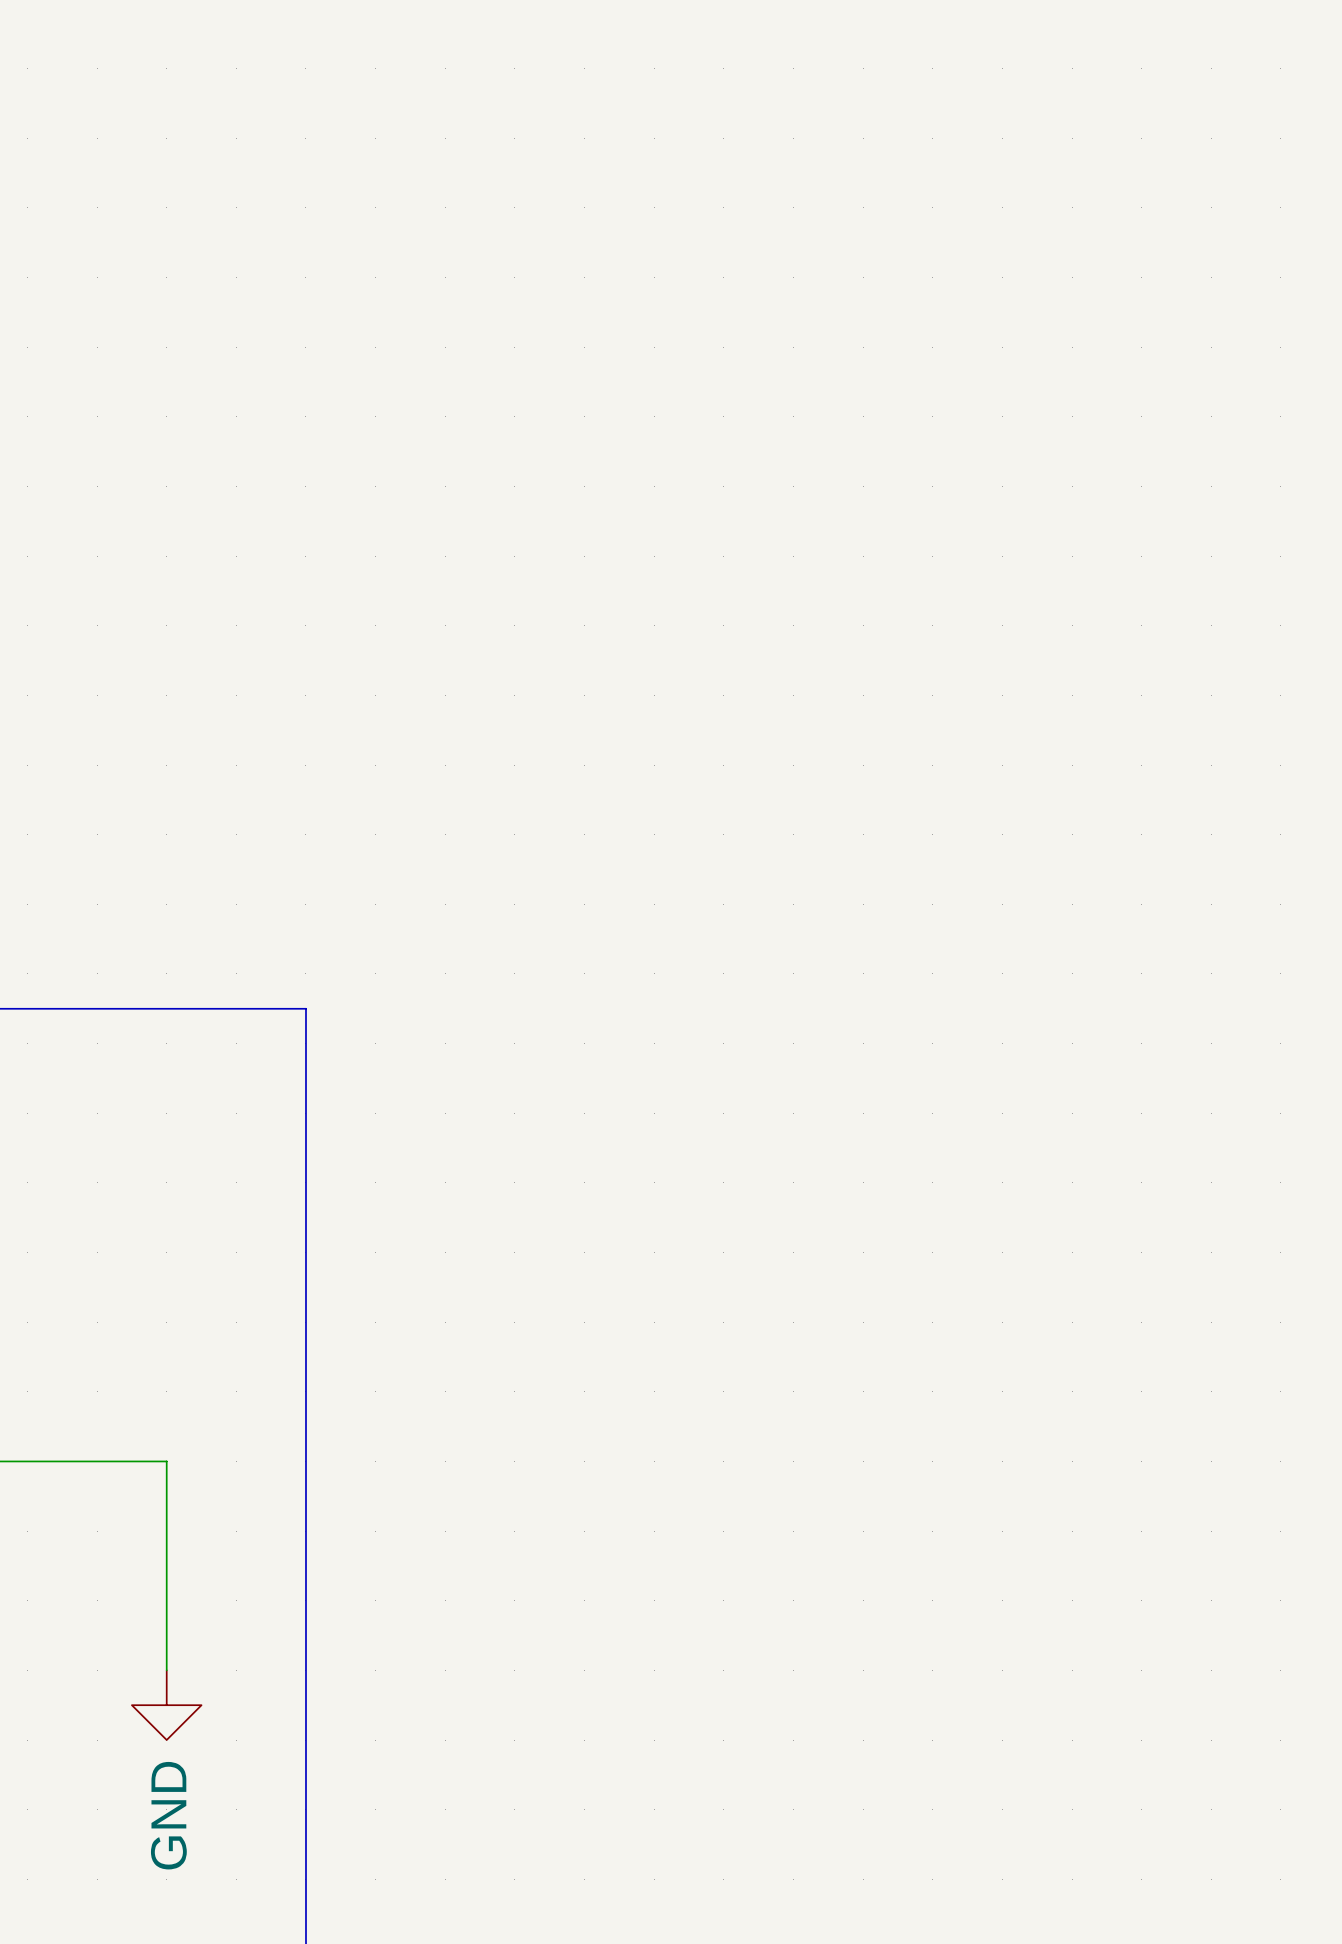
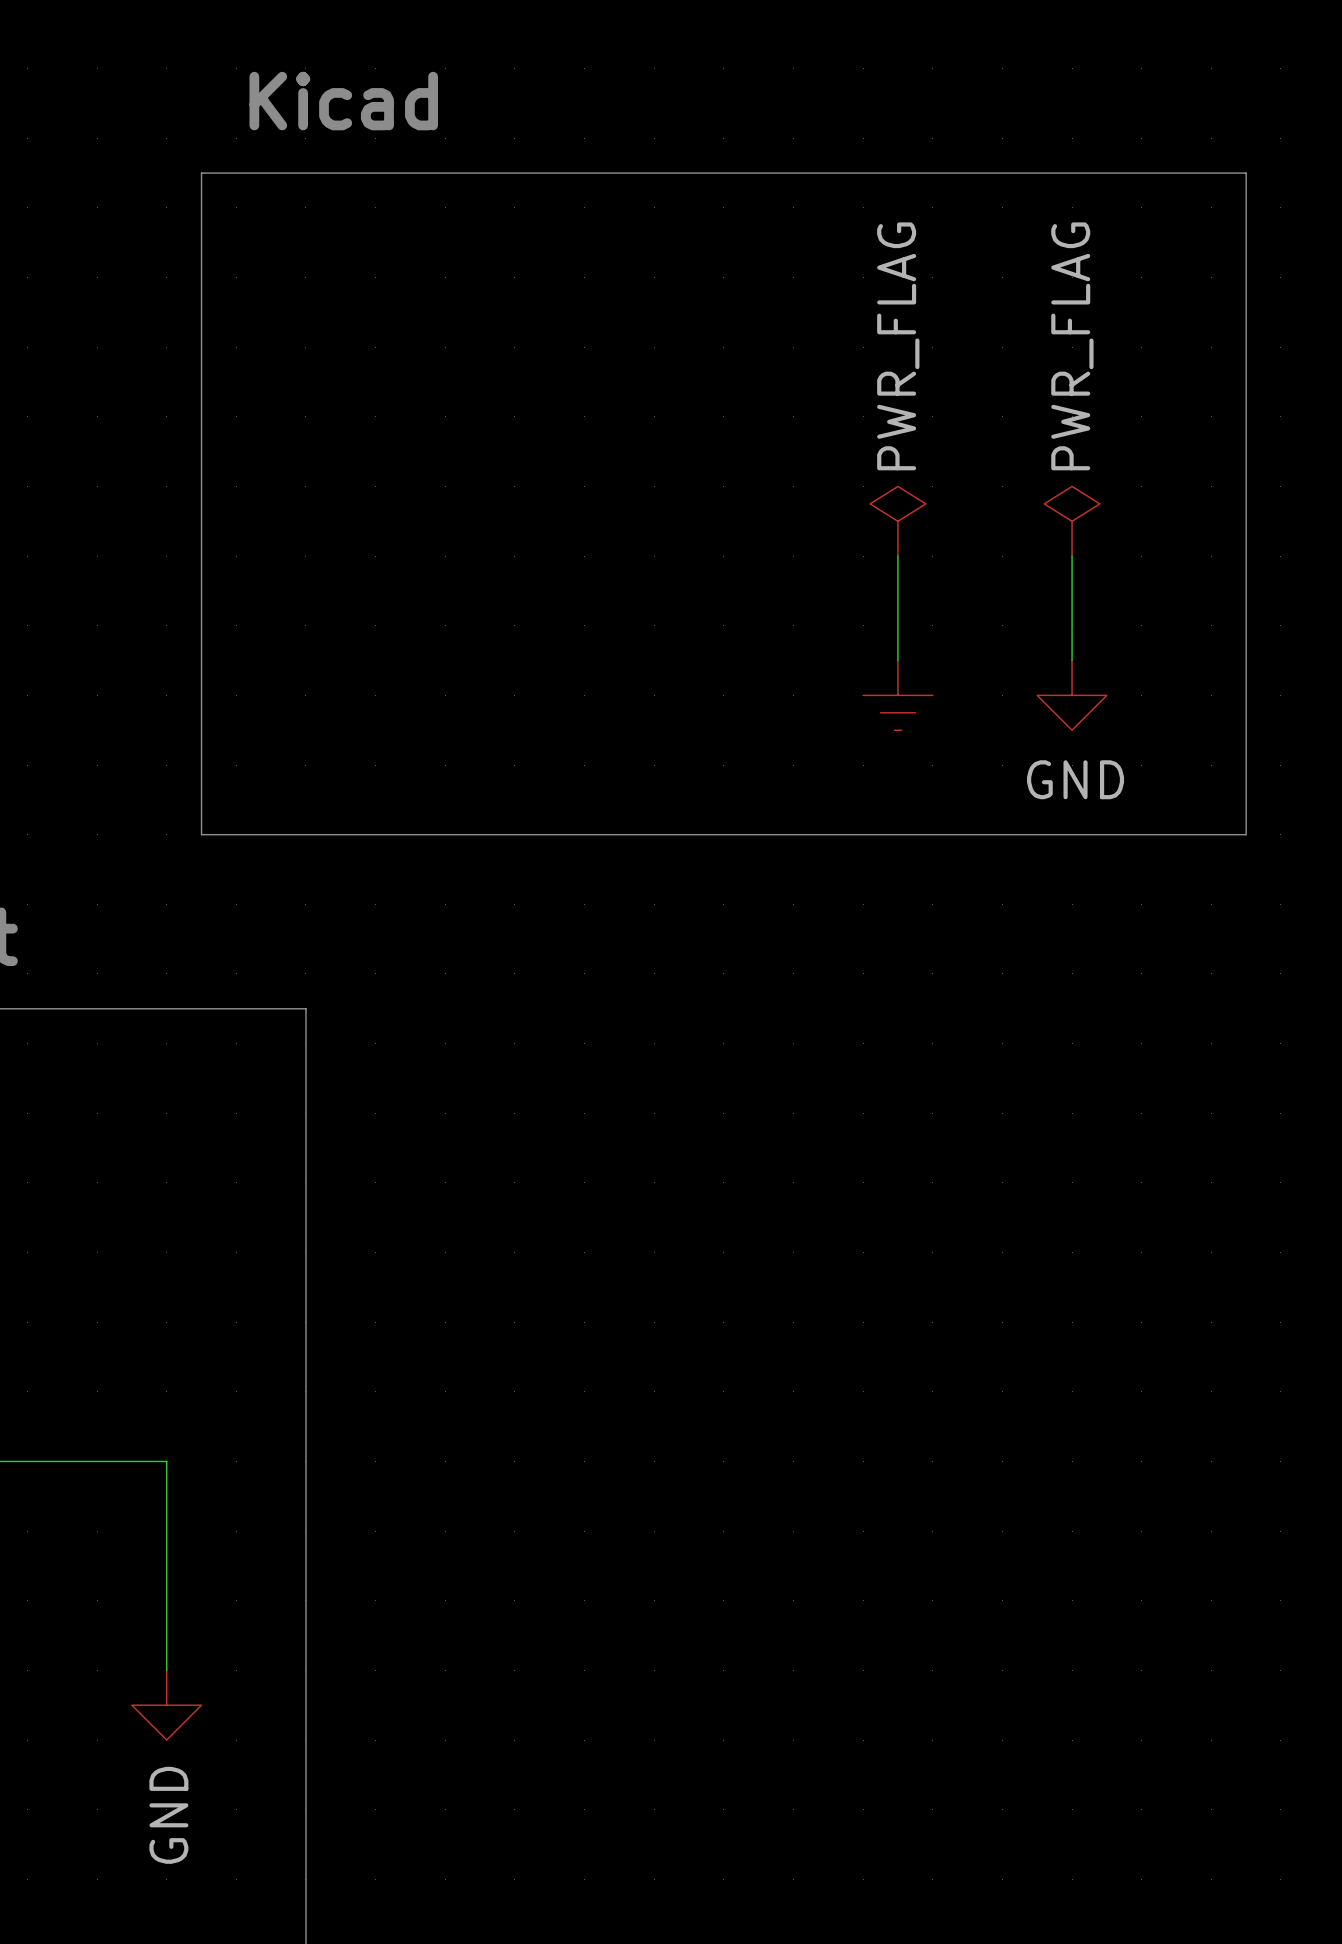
text: none -> Kicad (343, 101)
line: none -> (201, 173) (201, 834) (1246, 834) (1246, 173) (201, 173)
power symbol: none -> PWR_FLAG (897, 521)
power symbol: none -> PWR_FLAG (1072, 521)
wire: none -> (897, 556) (897, 660)
wire: none -> (1072, 556) (1072, 660)
power symbol: none -> (897, 695)
power symbol: none -> GND (1072, 695)

